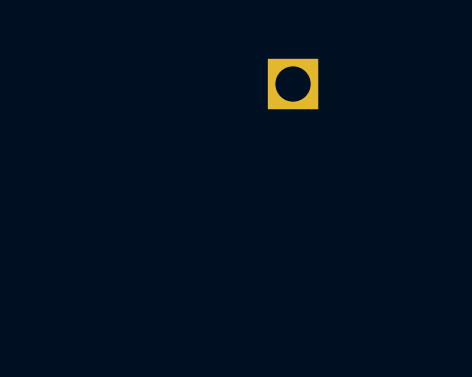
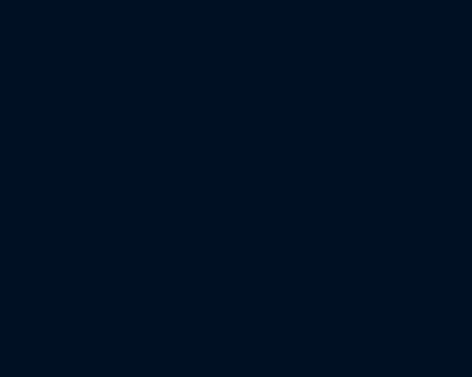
part: (293, 84) -> none

